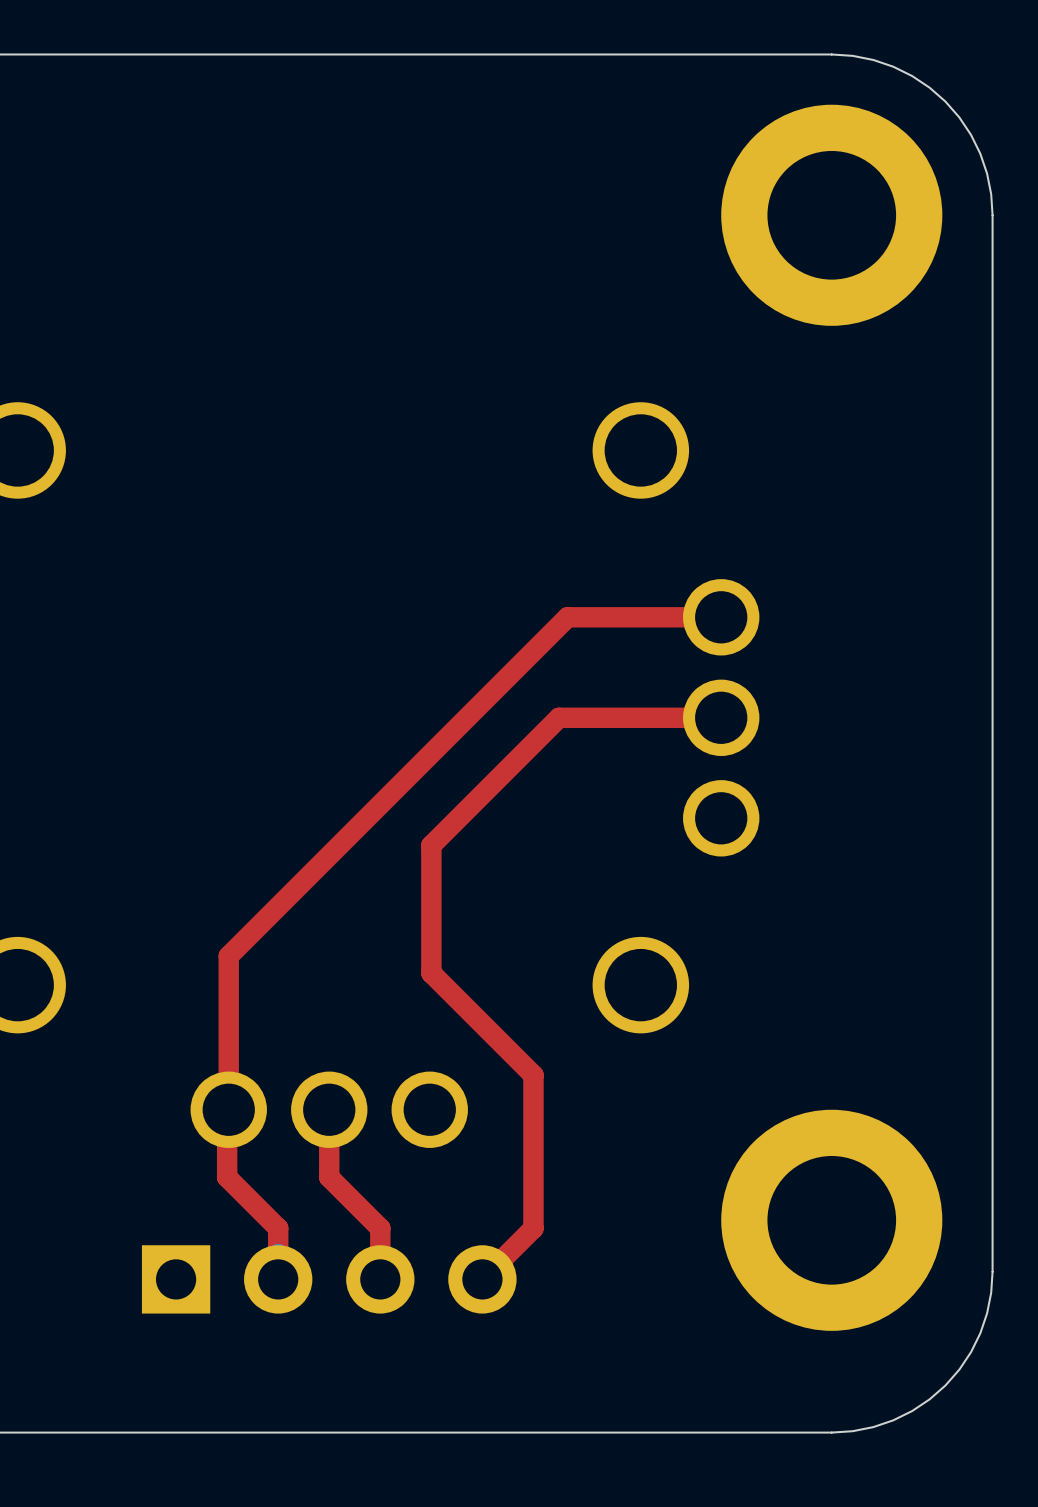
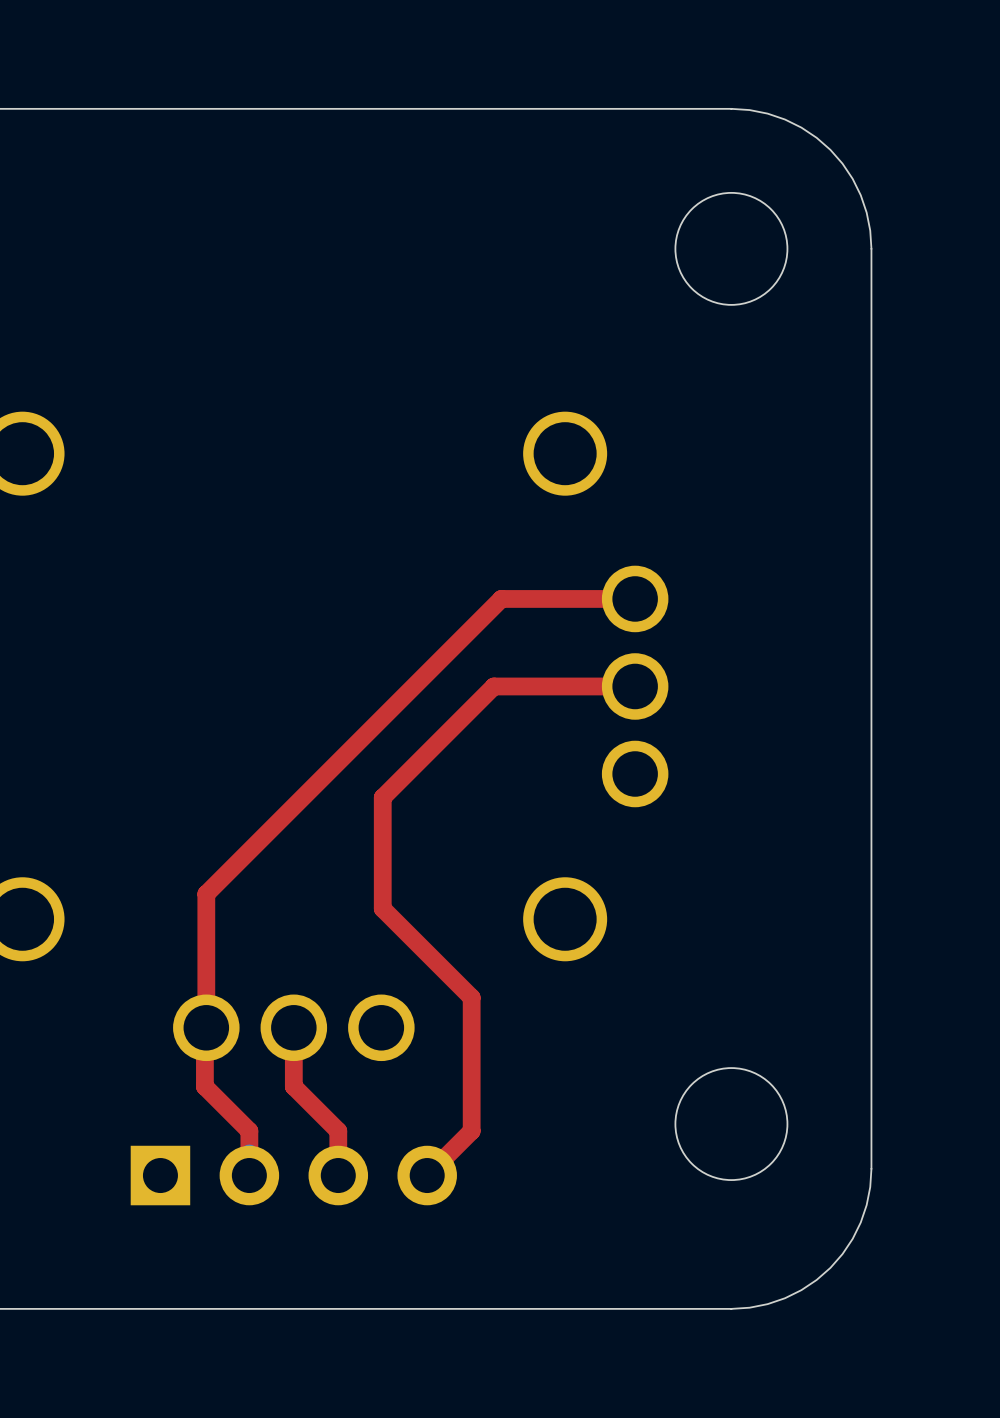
round board edge: none -> [674, 192, 789, 306]
part: (831, 215) -> none
round board edge: none -> [674, 1067, 789, 1181]
part: (831, 1220) -> none

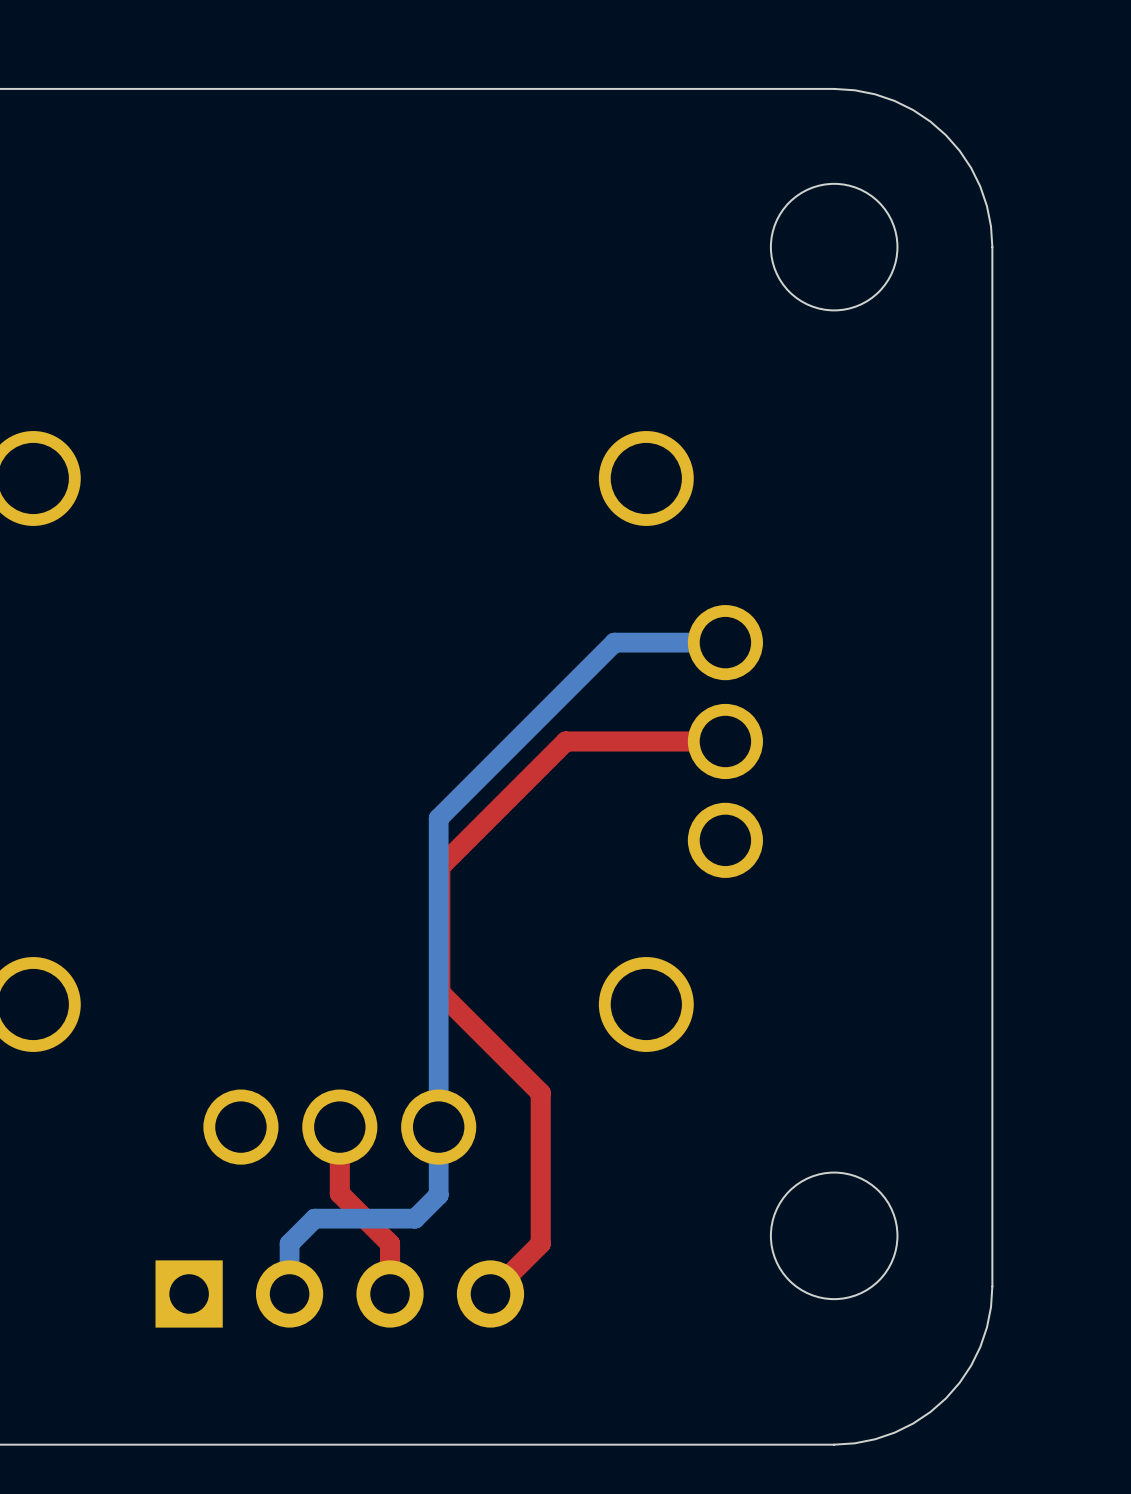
top track: (635, 598) (501, 598) (206, 894) (206, 1027) -> none
bottom track: none -> (725, 642) (614, 642) (438, 818) (438, 1195) (415, 1218) (314, 1218) (289, 1243) (289, 1268)
top track: (204, 1027) (204, 1086) (249, 1131) (249, 1175) -> none

